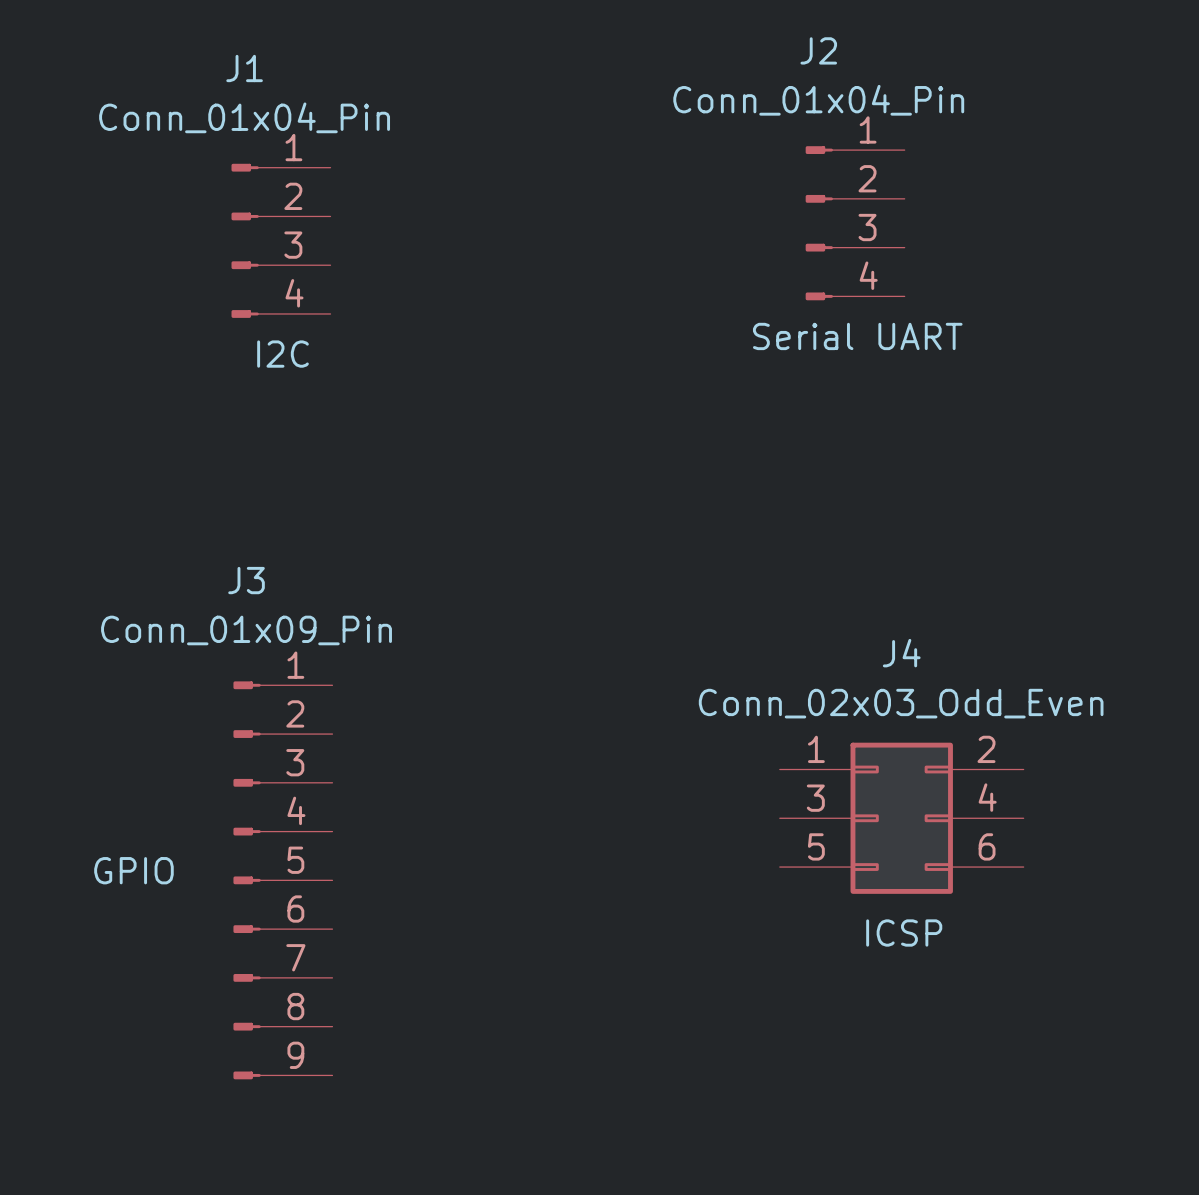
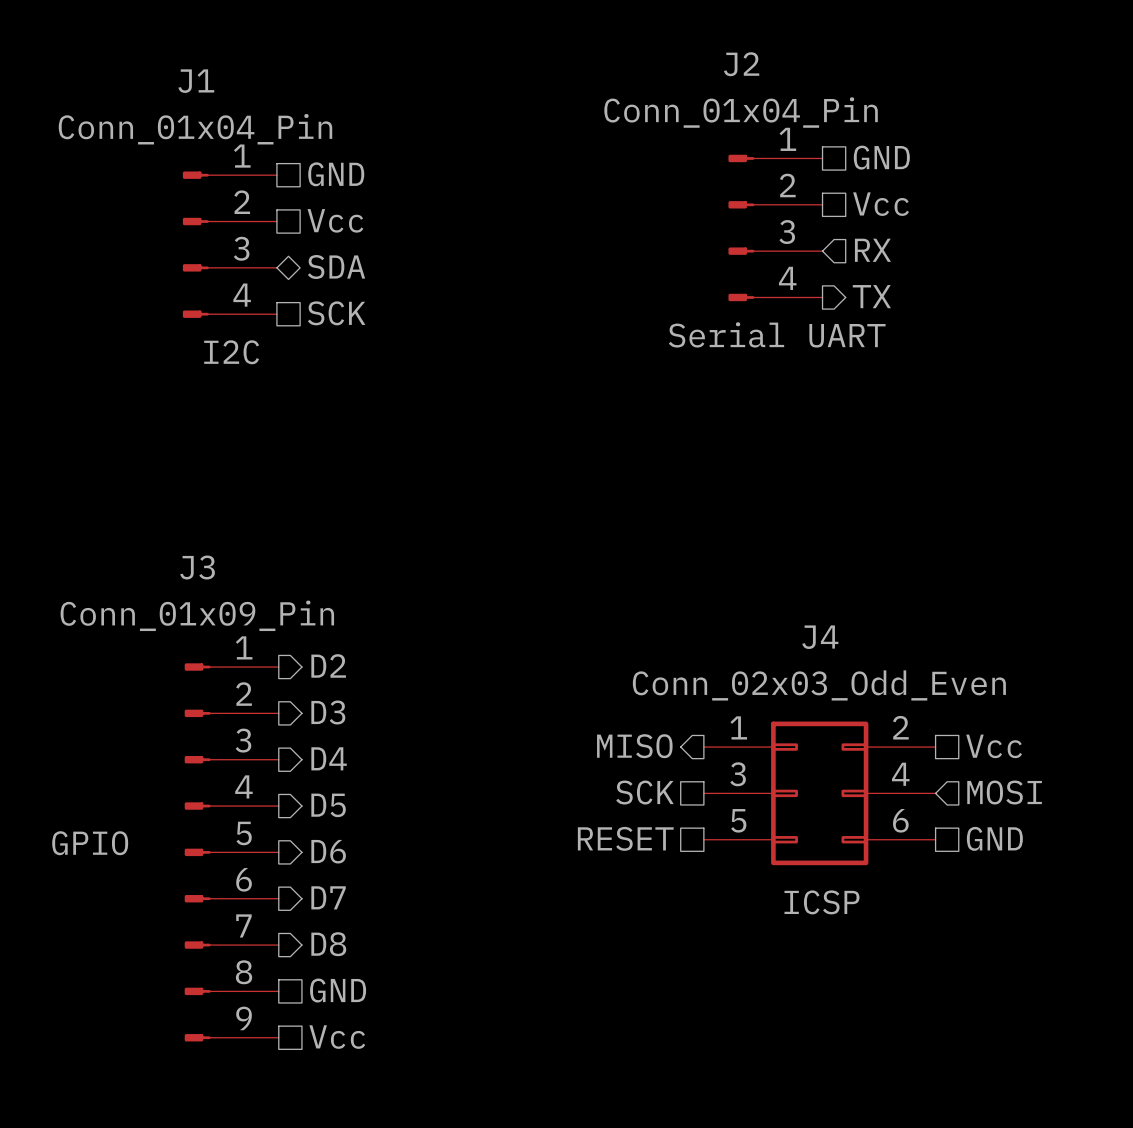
hierarchical label: none -> GND (881, 157)
hierarchical label: none -> GND (336, 174)
hierarchical label: none -> Vcc (881, 204)
hierarchical label: none -> Vcc (335, 220)
hierarchical label: none -> RX (872, 250)
hierarchical label: none -> SDA (336, 267)
hierarchical label: none -> TX (871, 296)
hierarchical label: none -> SCK (336, 313)
hierarchical label: none -> D2 (328, 665)
hierarchical label: none -> D3 (328, 712)
hierarchical label: none -> MISO (634, 746)
hierarchical label: none -> Vcc (994, 746)
hierarchical label: none -> D4 (329, 758)
hierarchical label: none -> SCK (644, 792)
hierarchical label: none -> MOSI (1004, 792)
hierarchical label: none -> D5 (328, 805)
hierarchical label: none -> RESET (625, 838)
hierarchical label: none -> GND (994, 838)
hierarchical label: none -> D6 (328, 851)
hierarchical label: none -> D7 (328, 897)
hierarchical label: none -> D8 (328, 944)
hierarchical label: none -> GND (338, 990)
hierarchical label: none -> Vcc (337, 1037)

